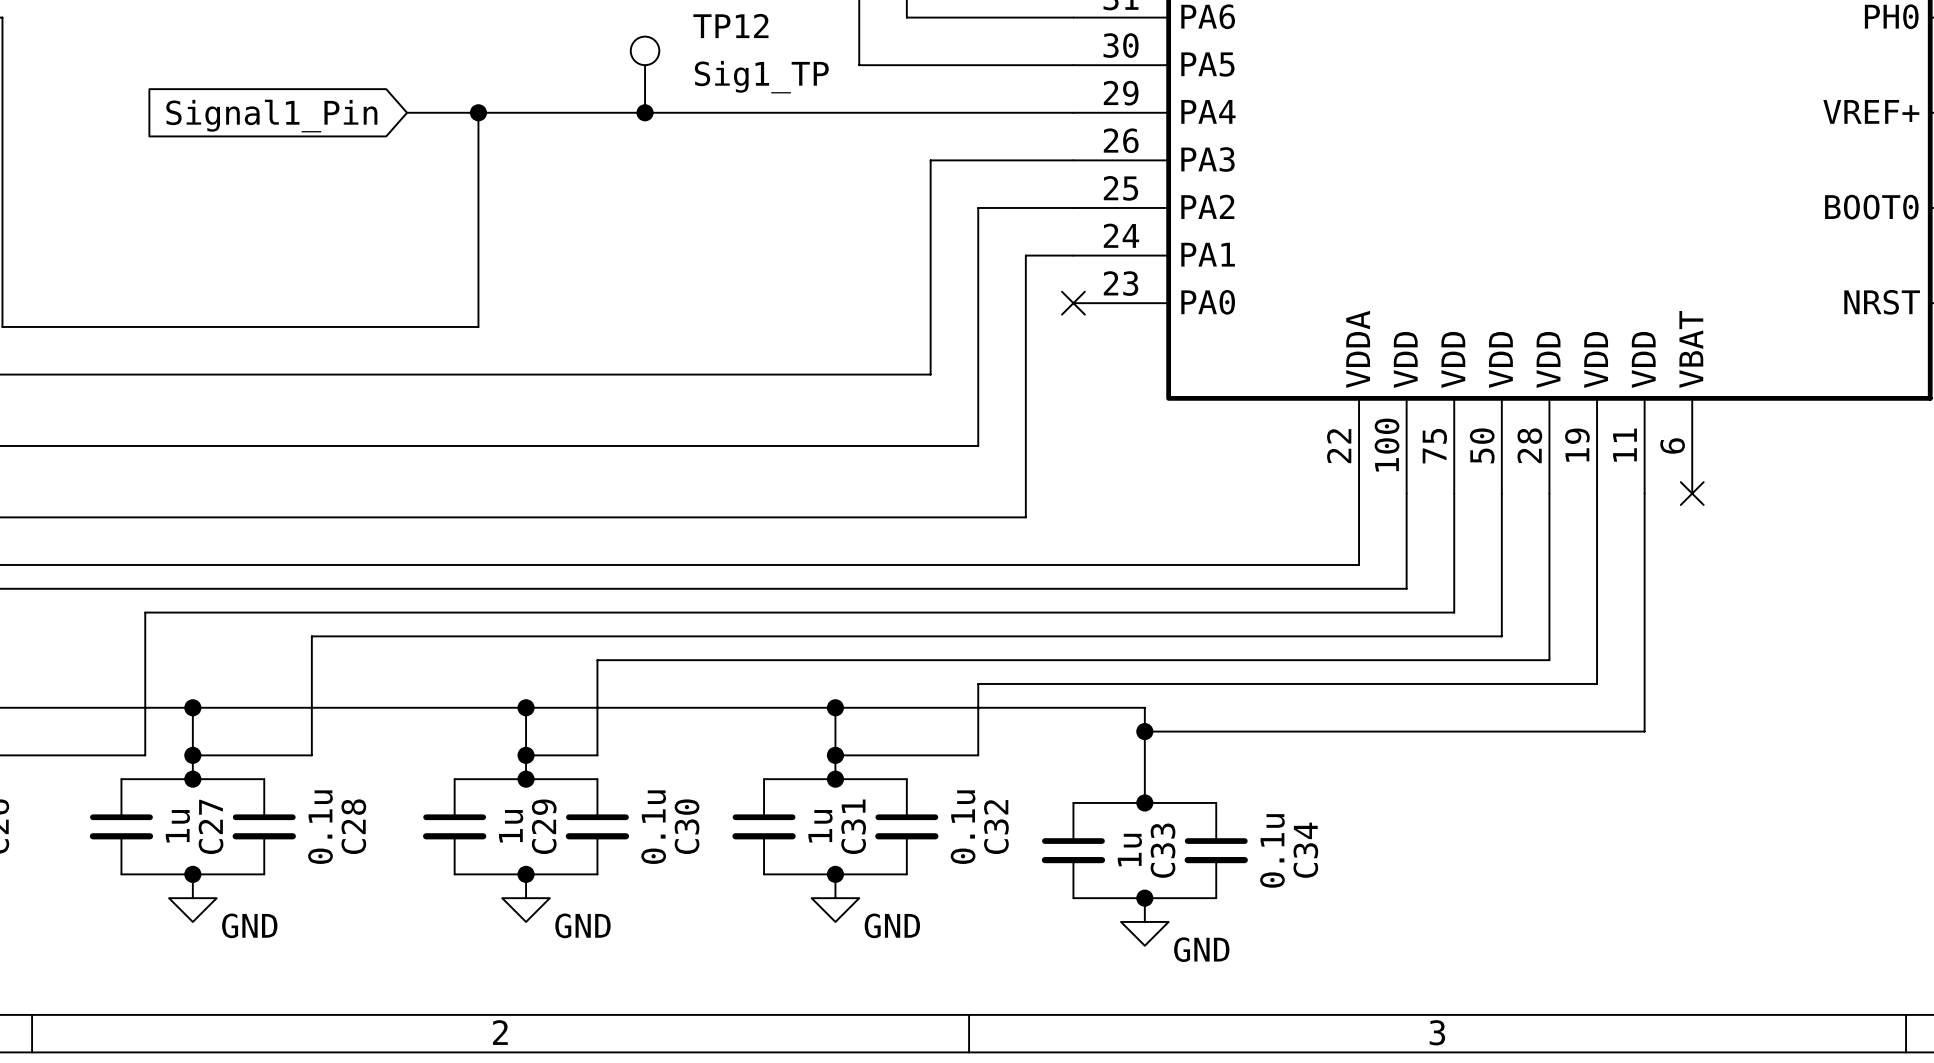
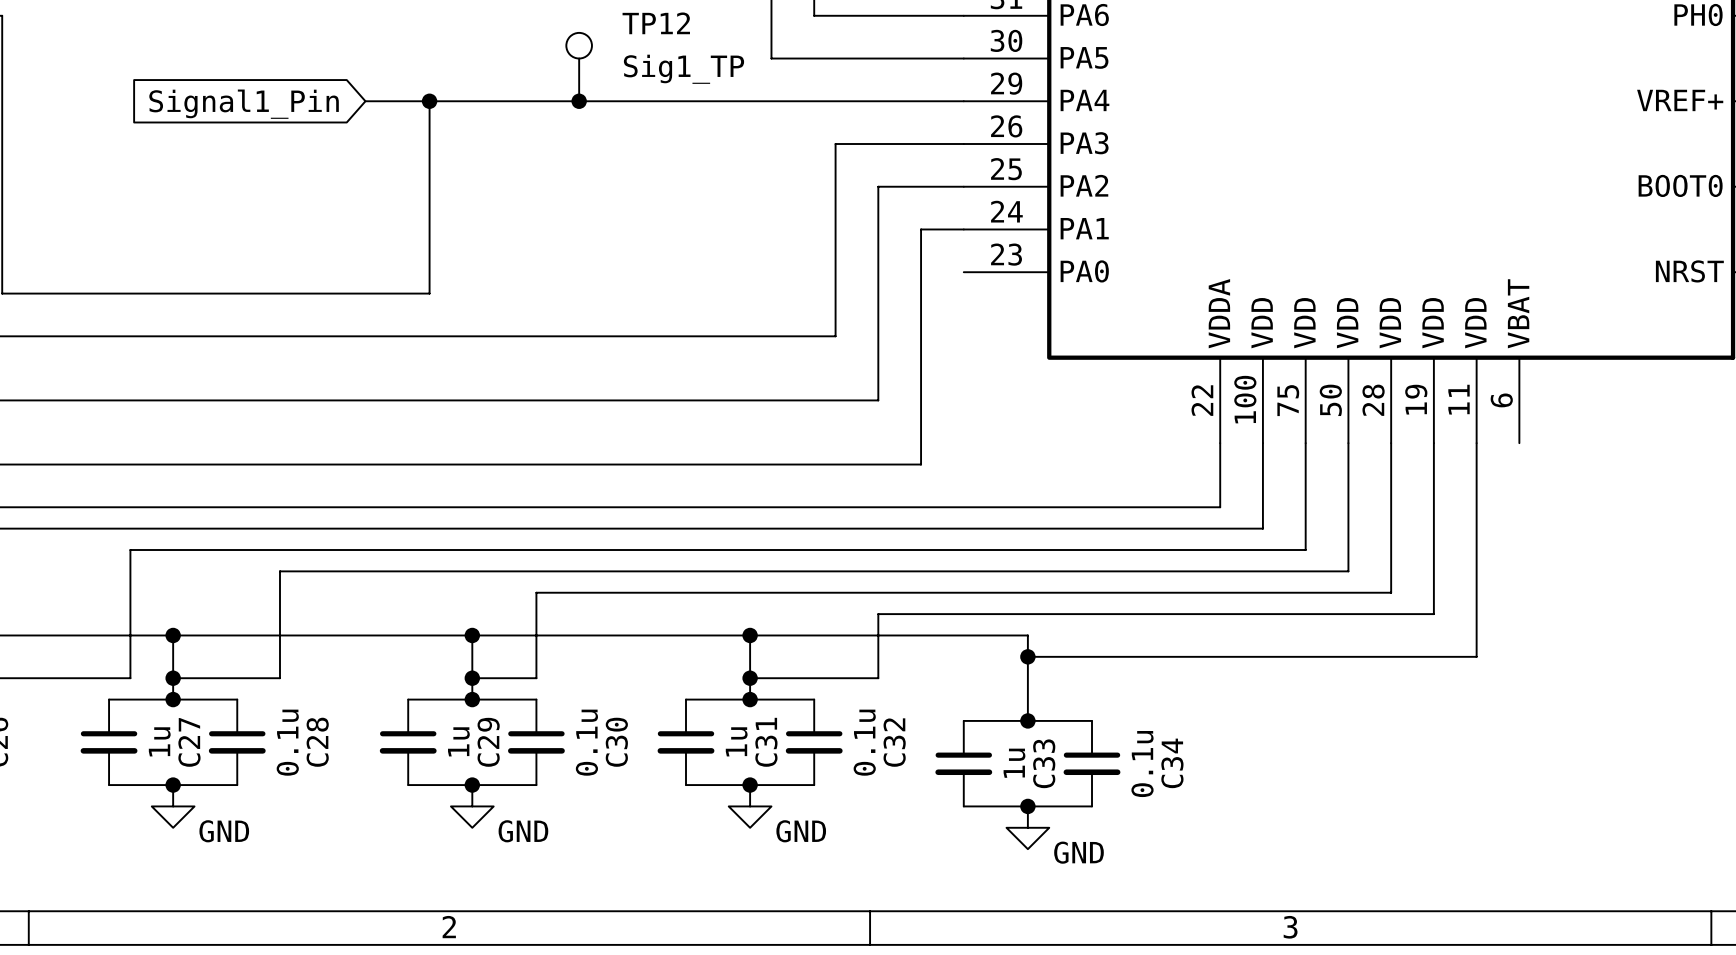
no-connect mark: (1073, 303) -> none
no-connect mark: (1692, 493) -> none

